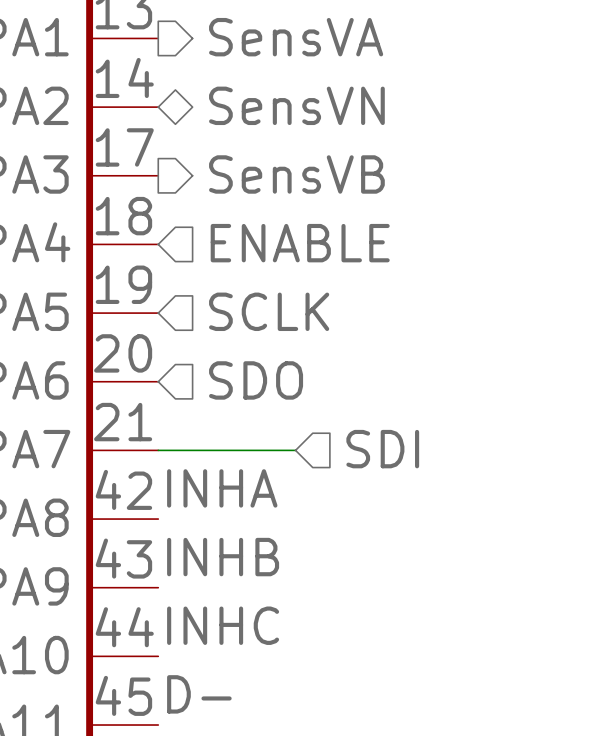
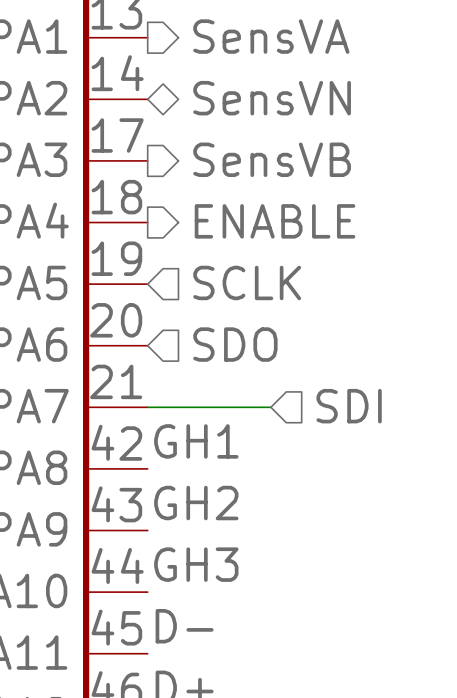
hierarchical label shape: input (300, 243) -> output (275, 221)
label: INHA (222, 488) -> GH1 (196, 441)
label: INHB (223, 557) -> GH2 (196, 503)
label: INHC (223, 625) -> GH3 (196, 564)

